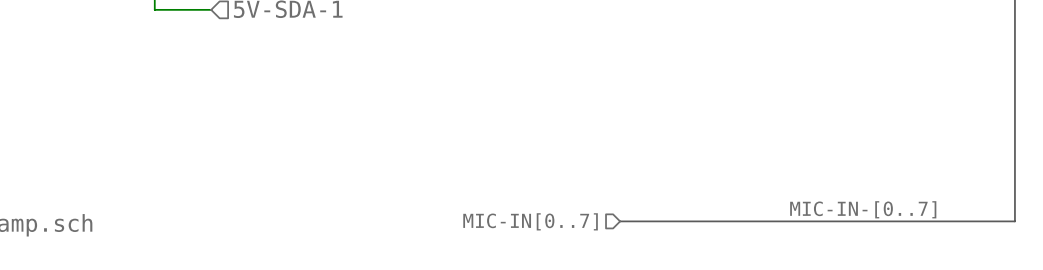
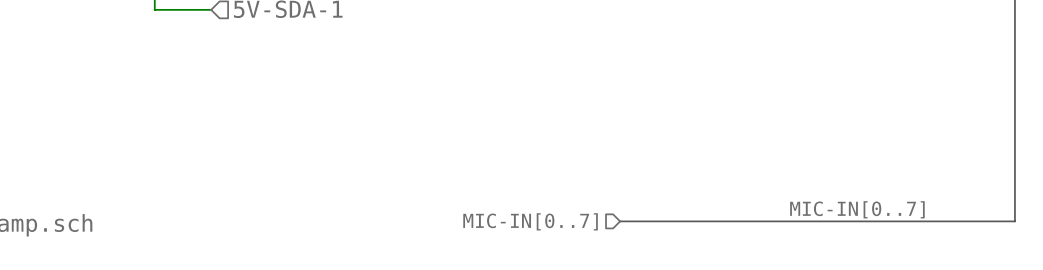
label: MIC-IN-[0..7] (863, 209) -> MIC-IN[0..7] (857, 209)

